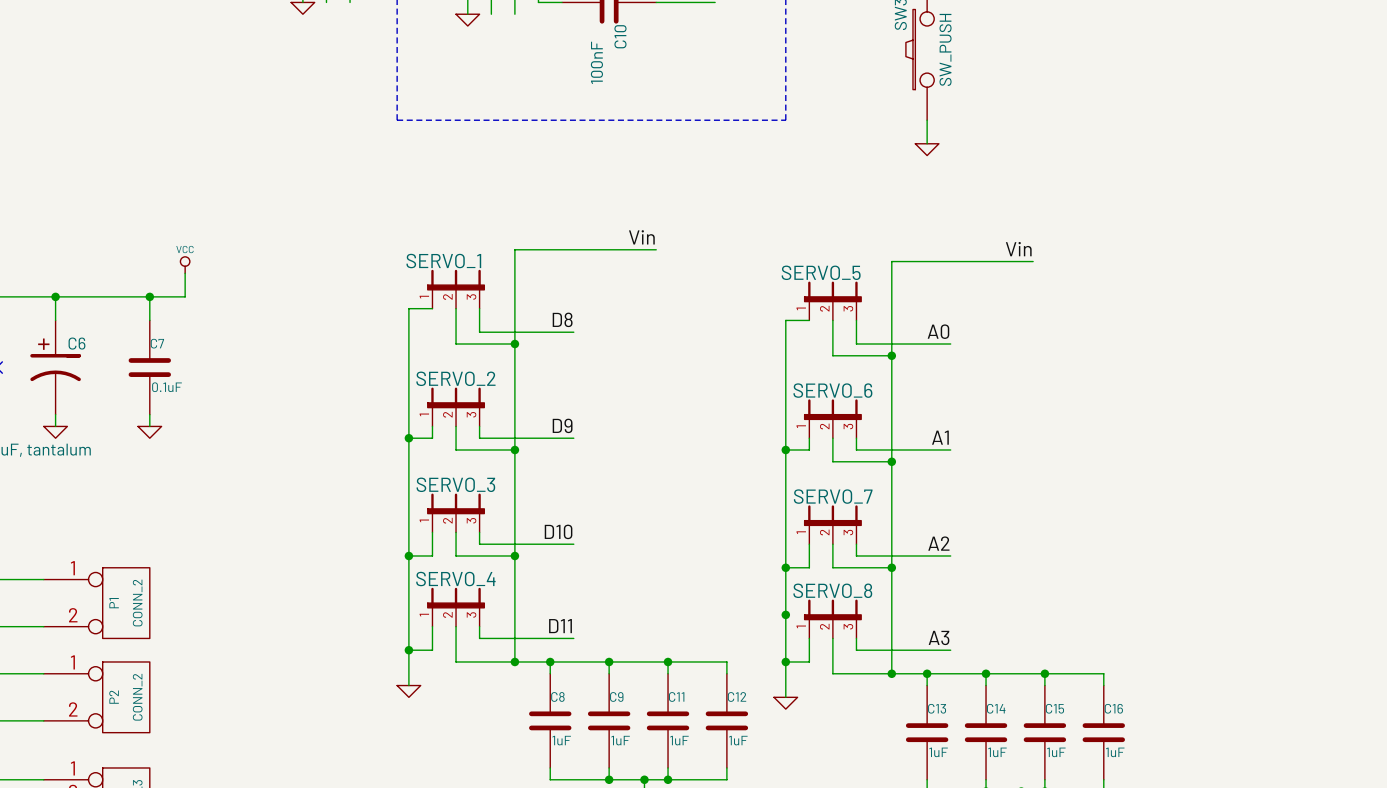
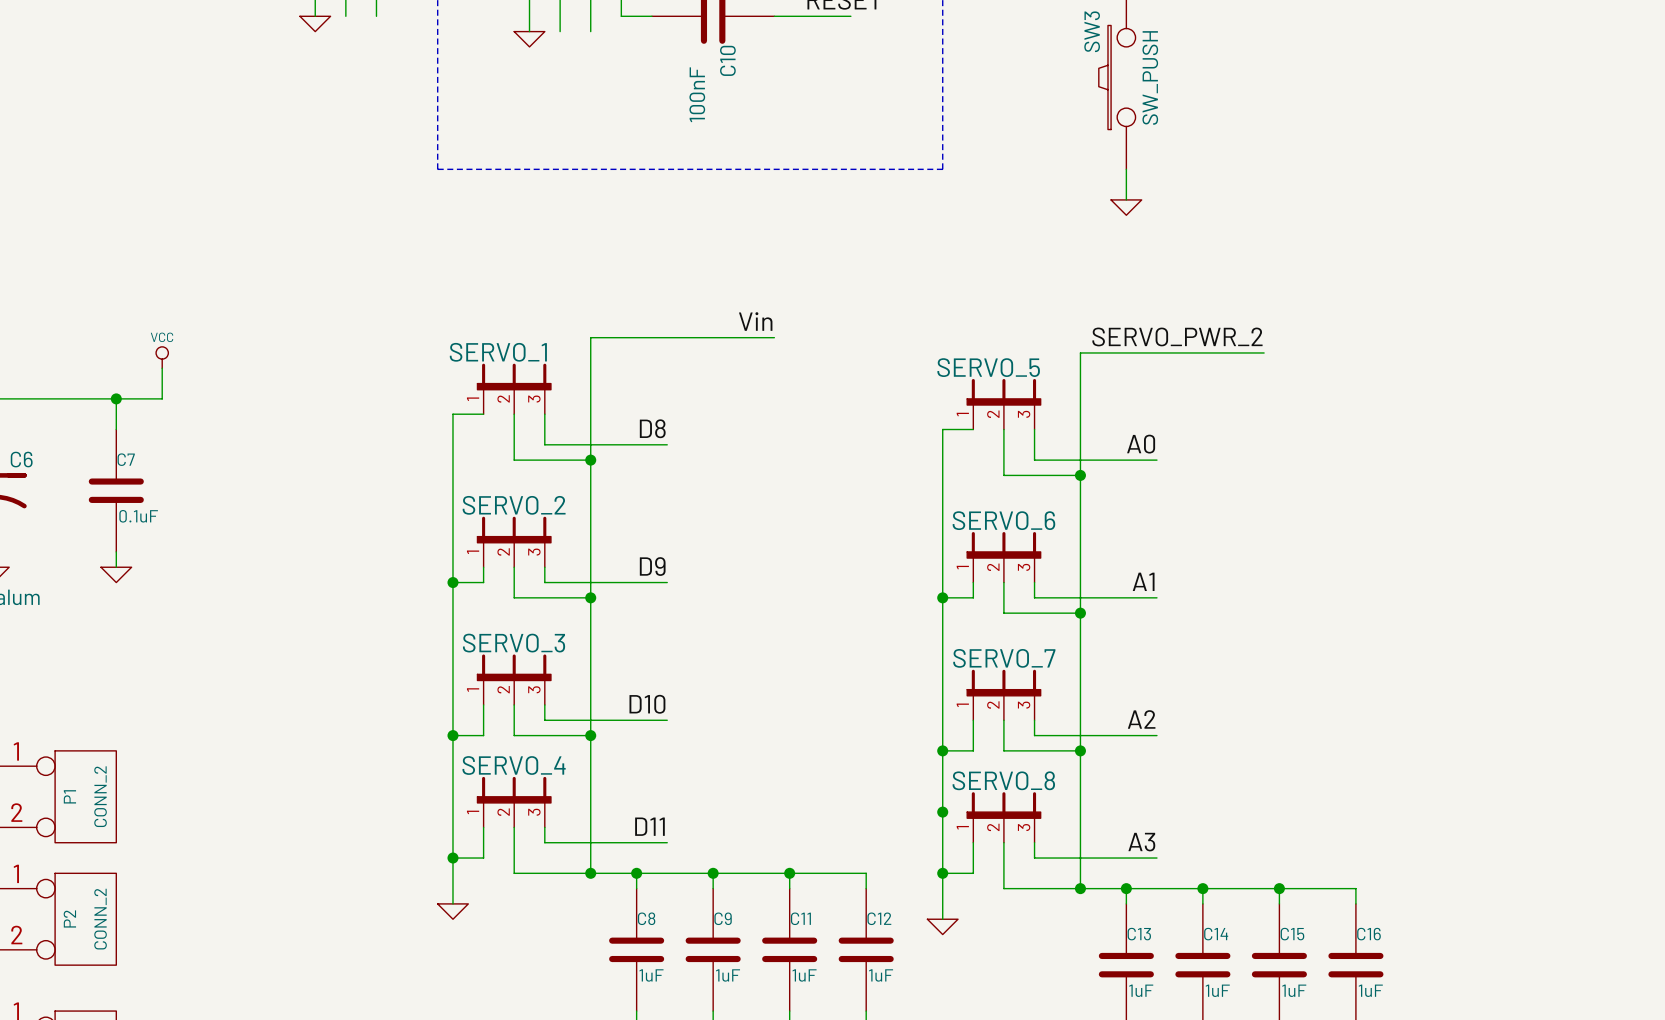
label: Vin (1018, 249) -> SERVO_PWR_2 (1177, 336)

